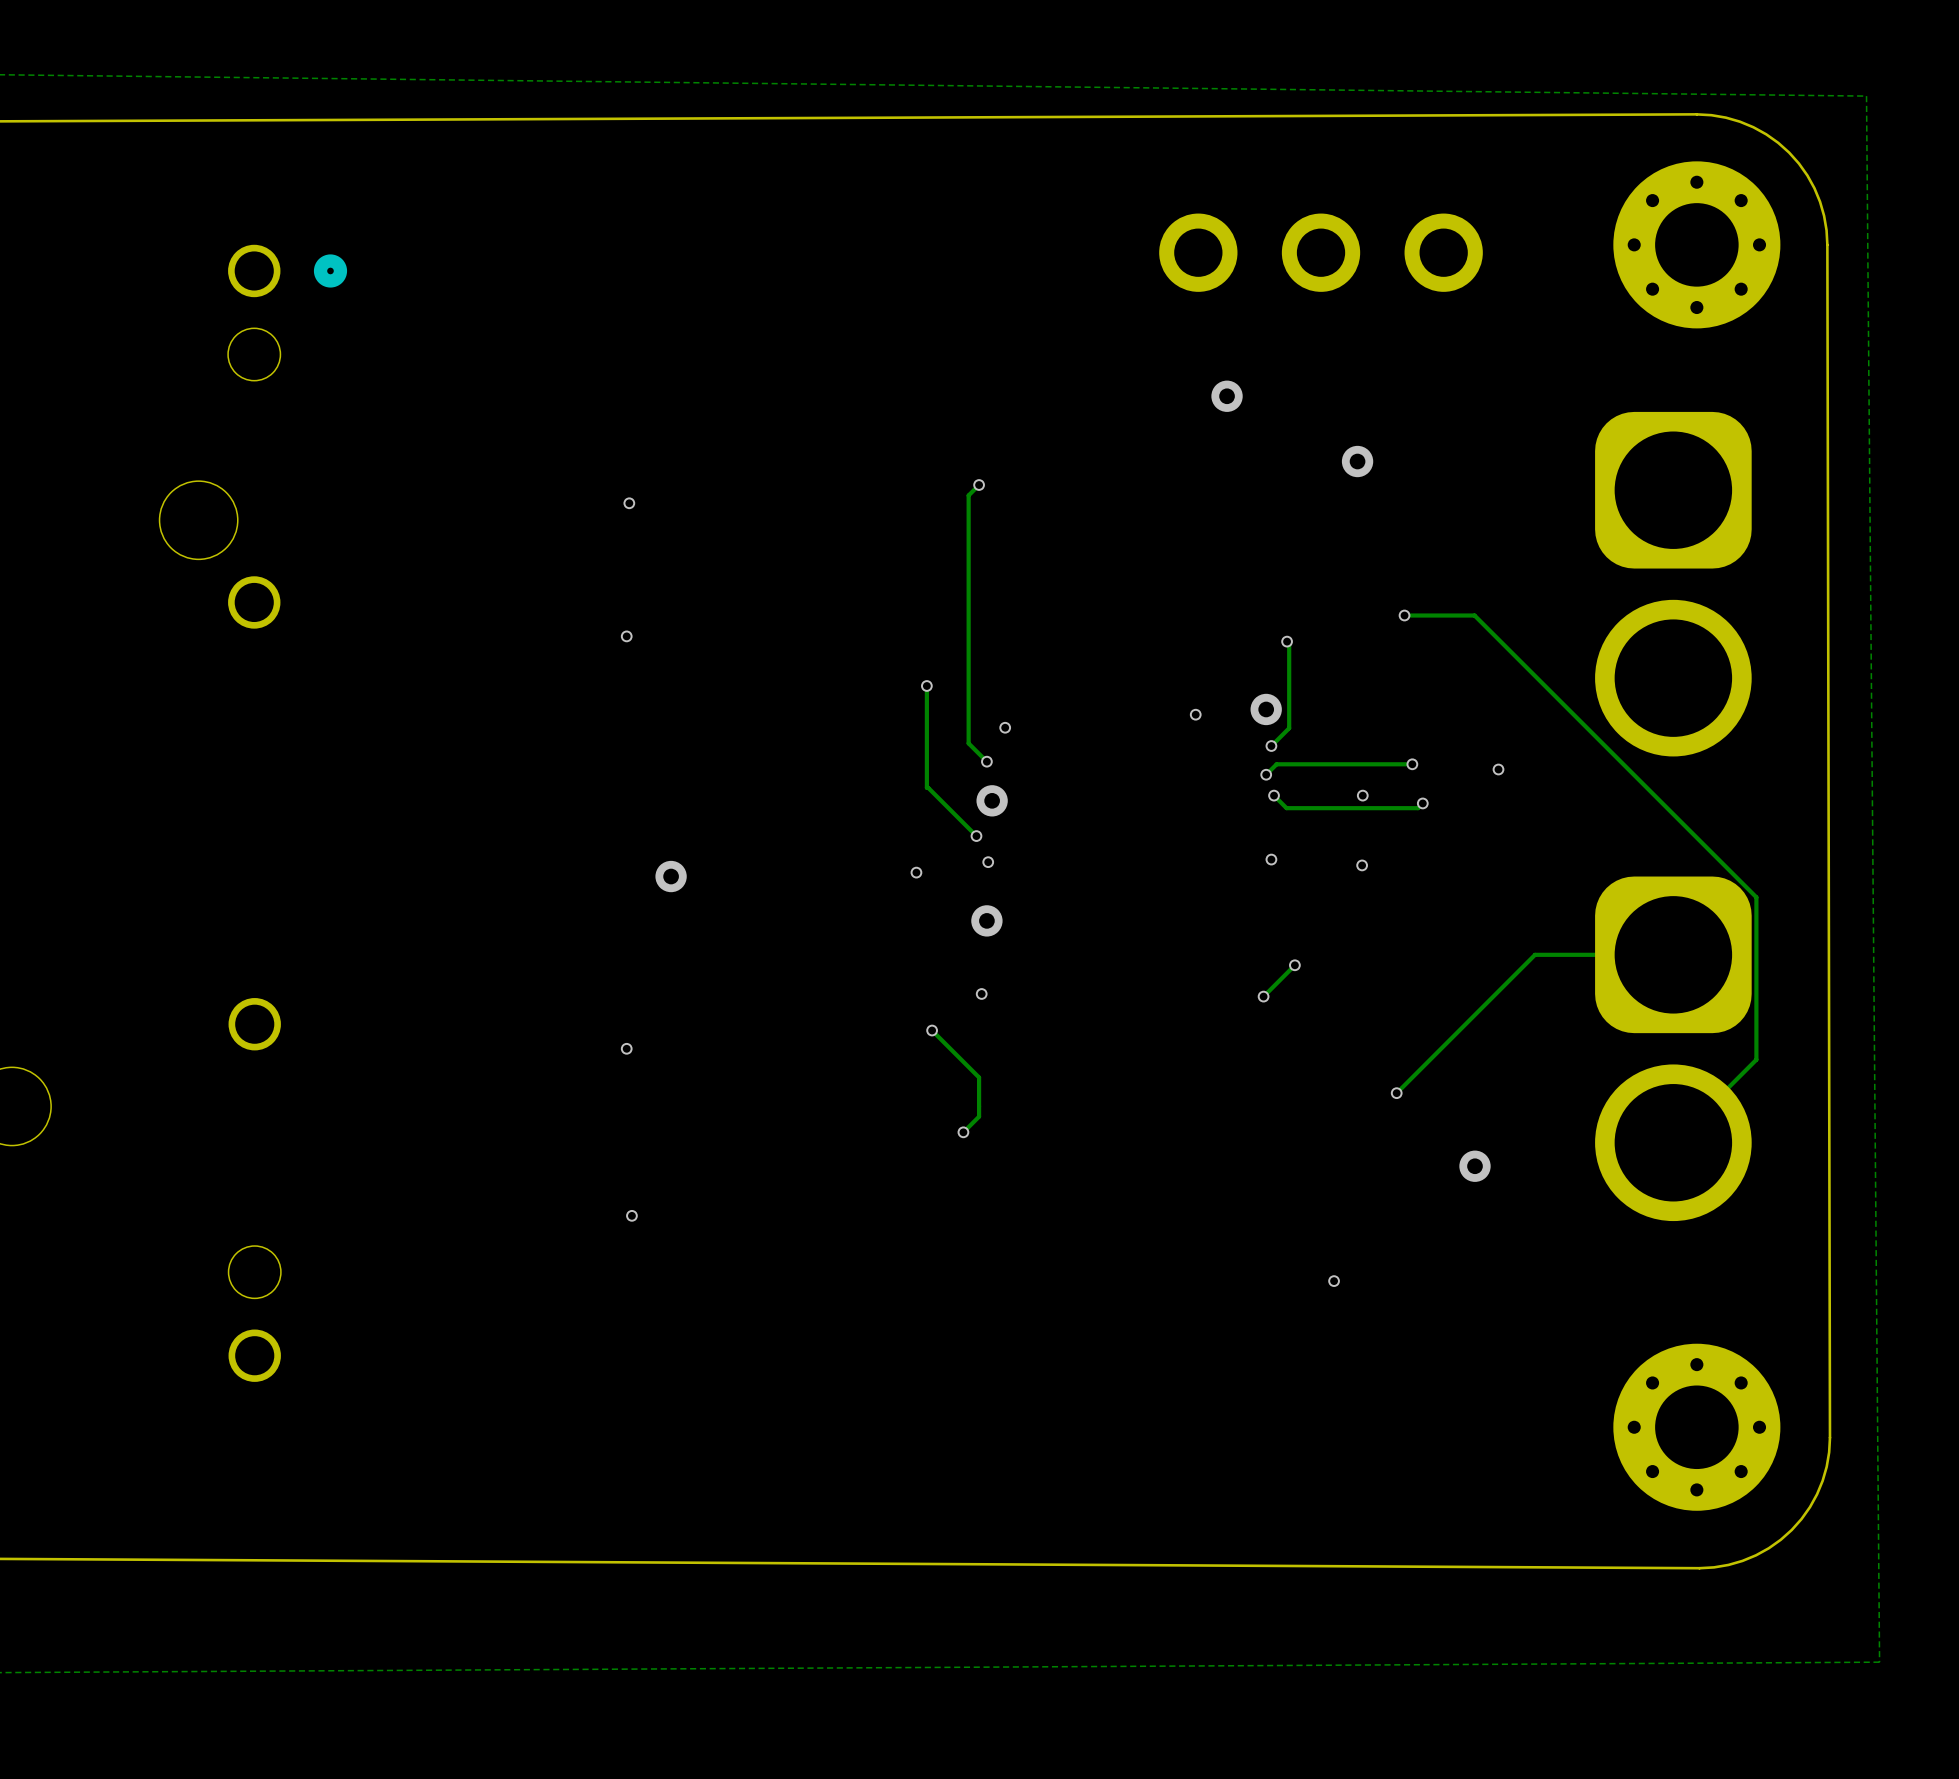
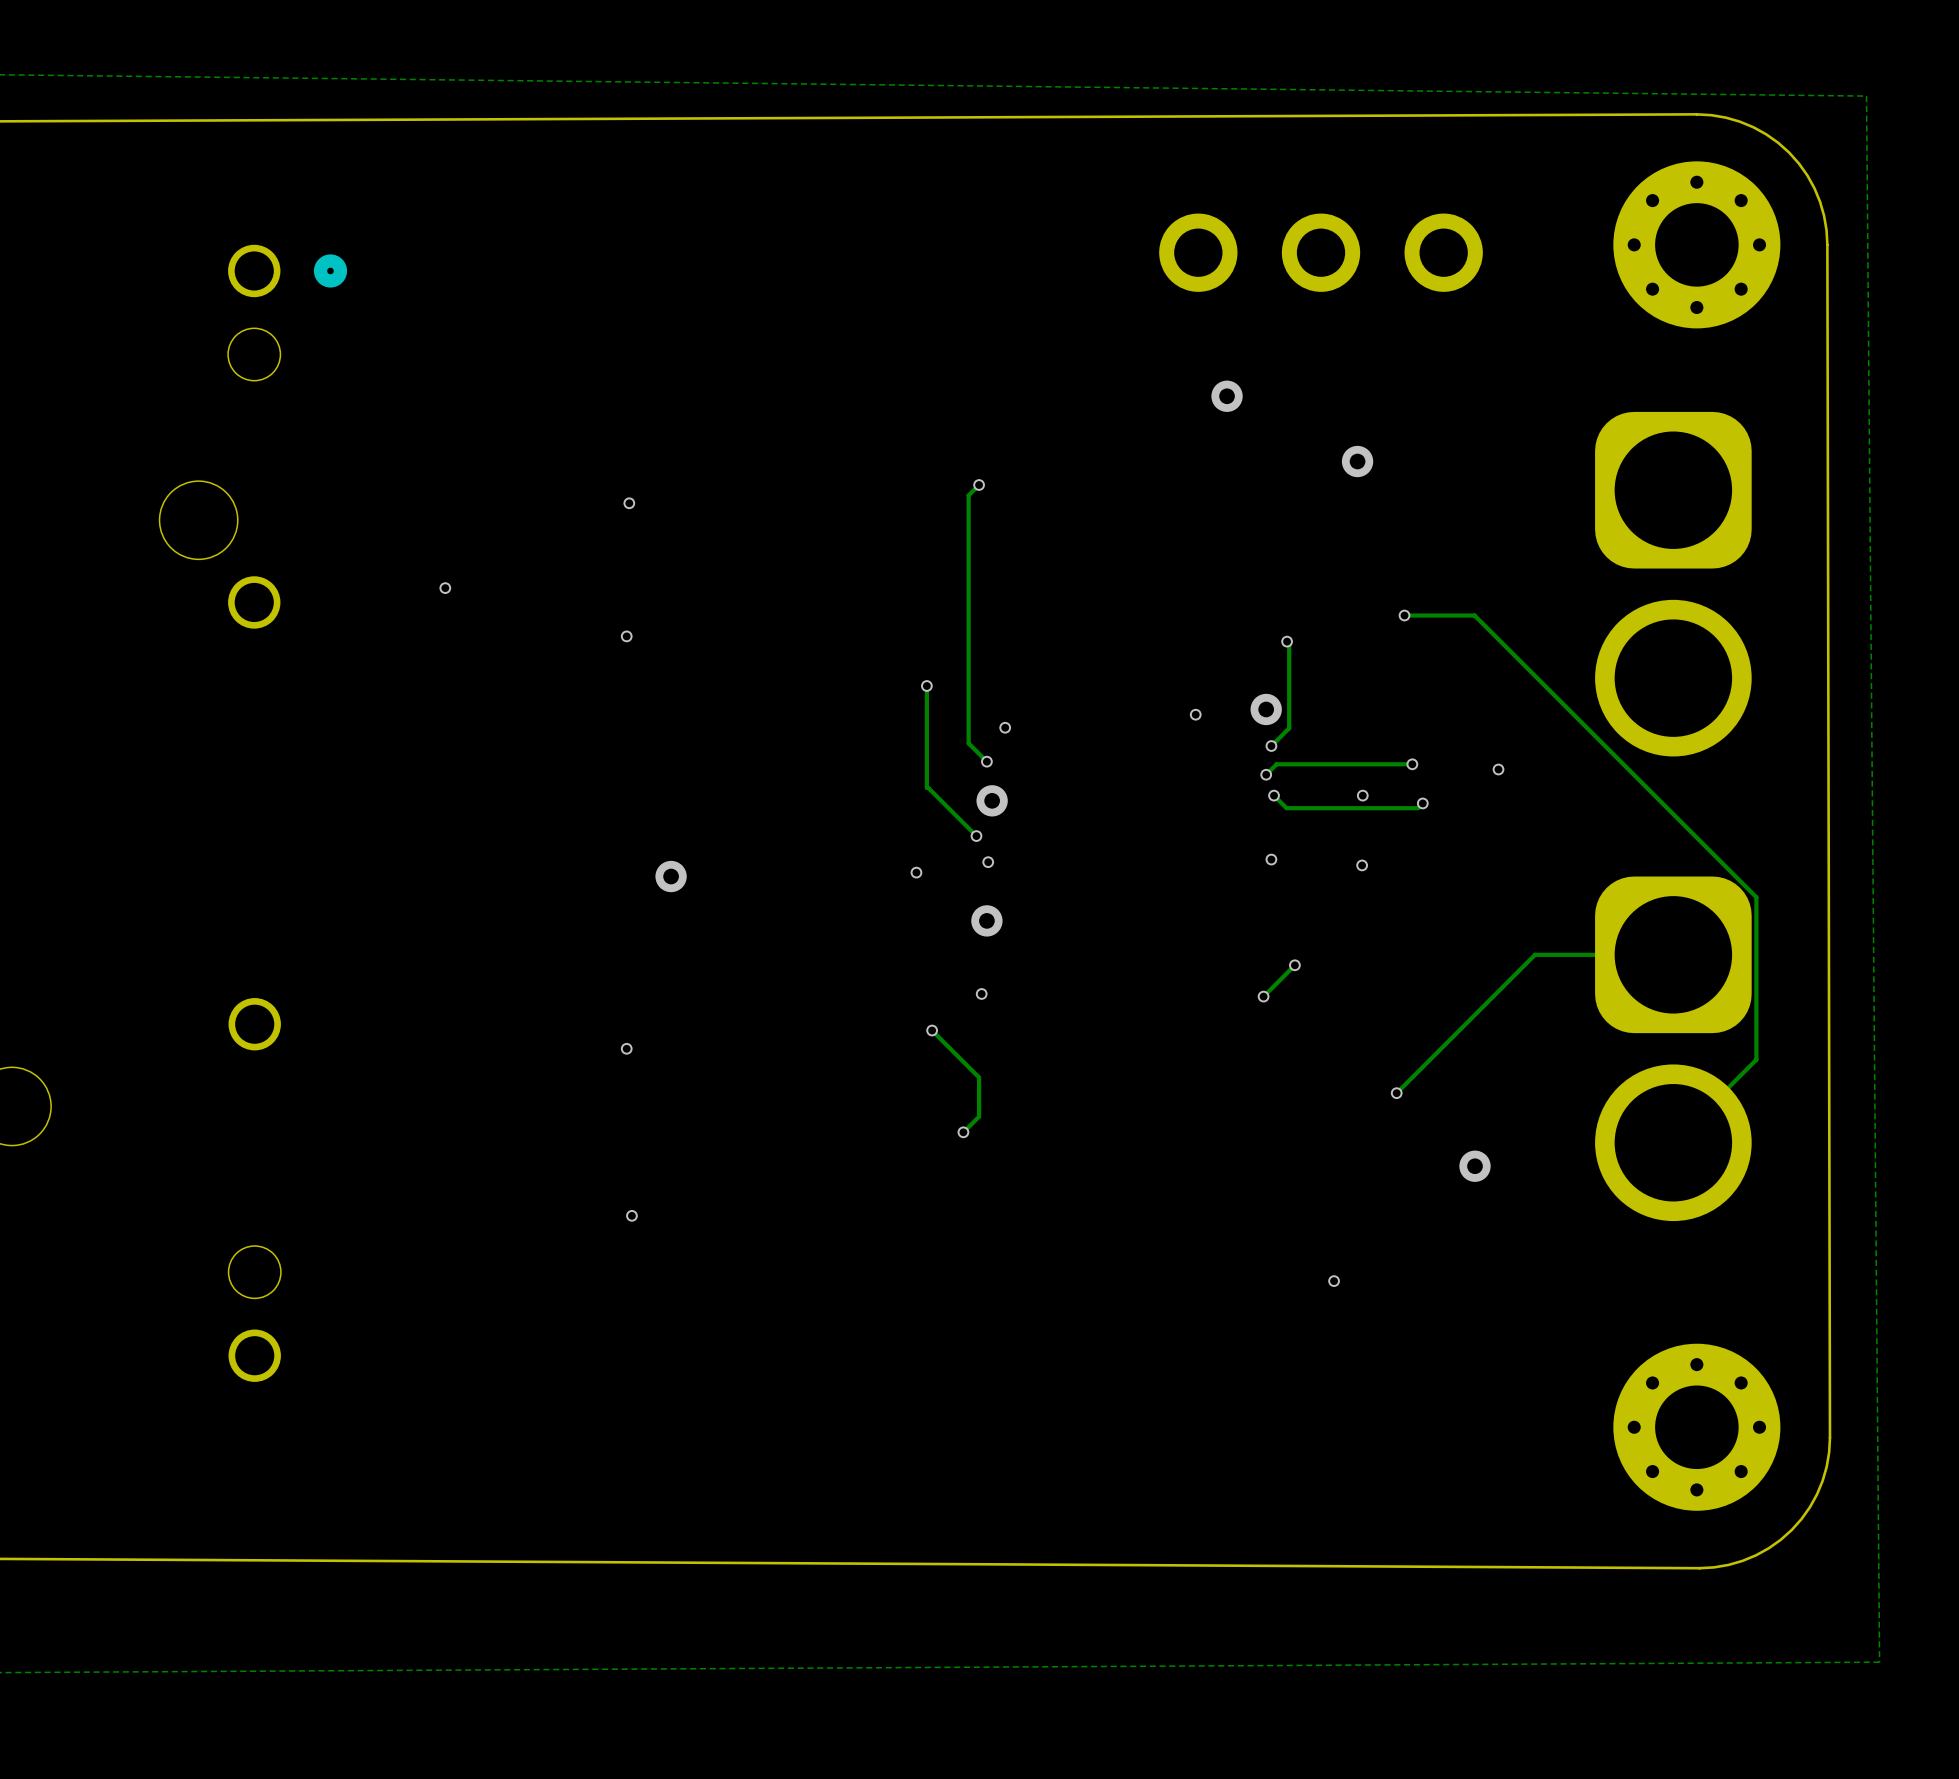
via: none -> (445, 588)

